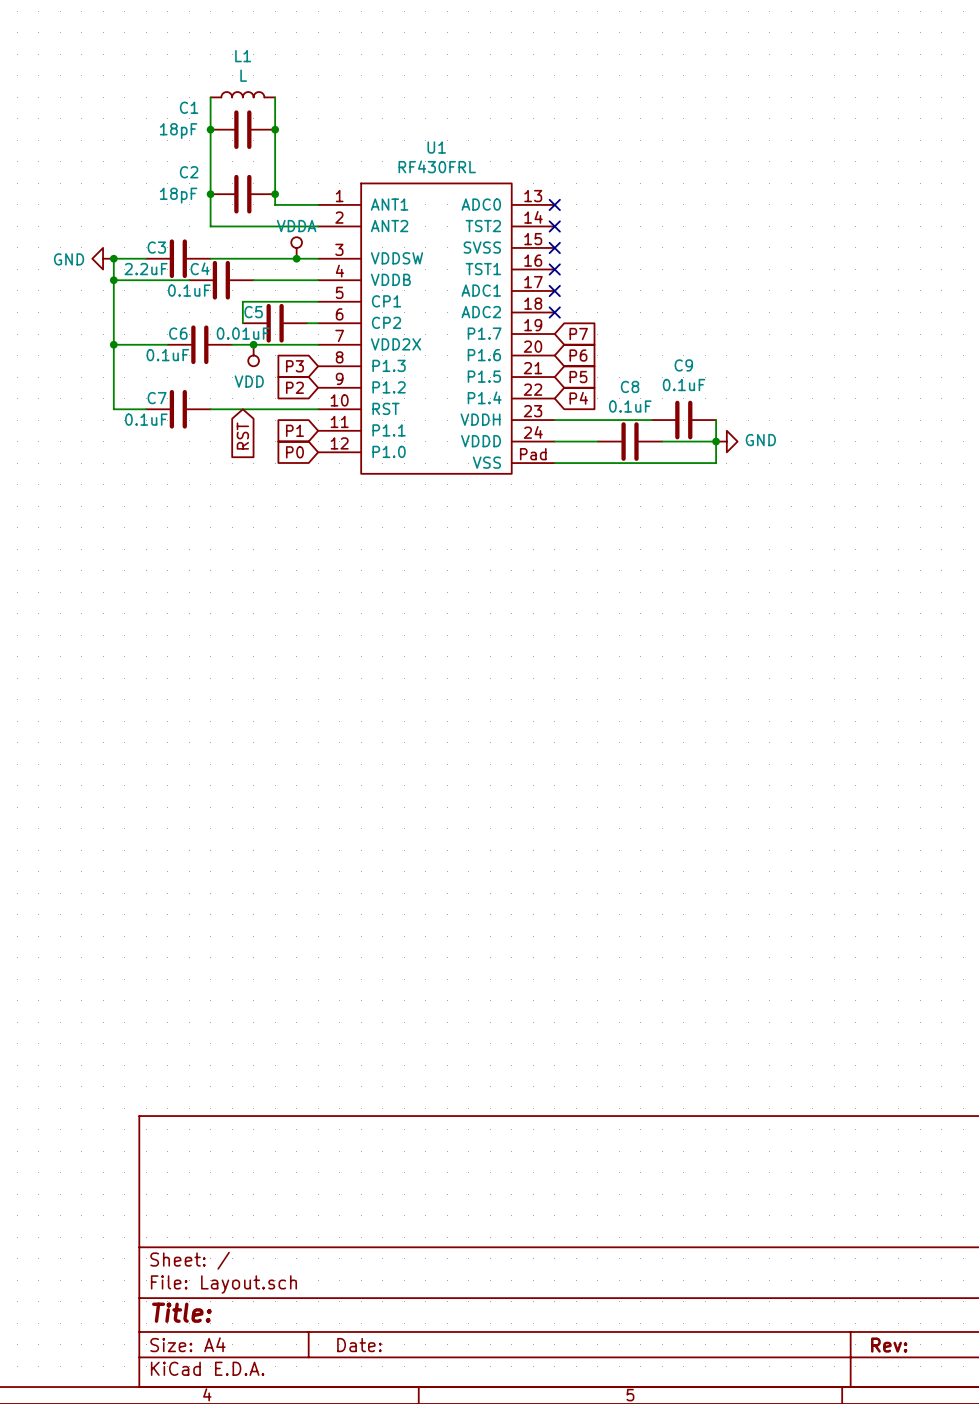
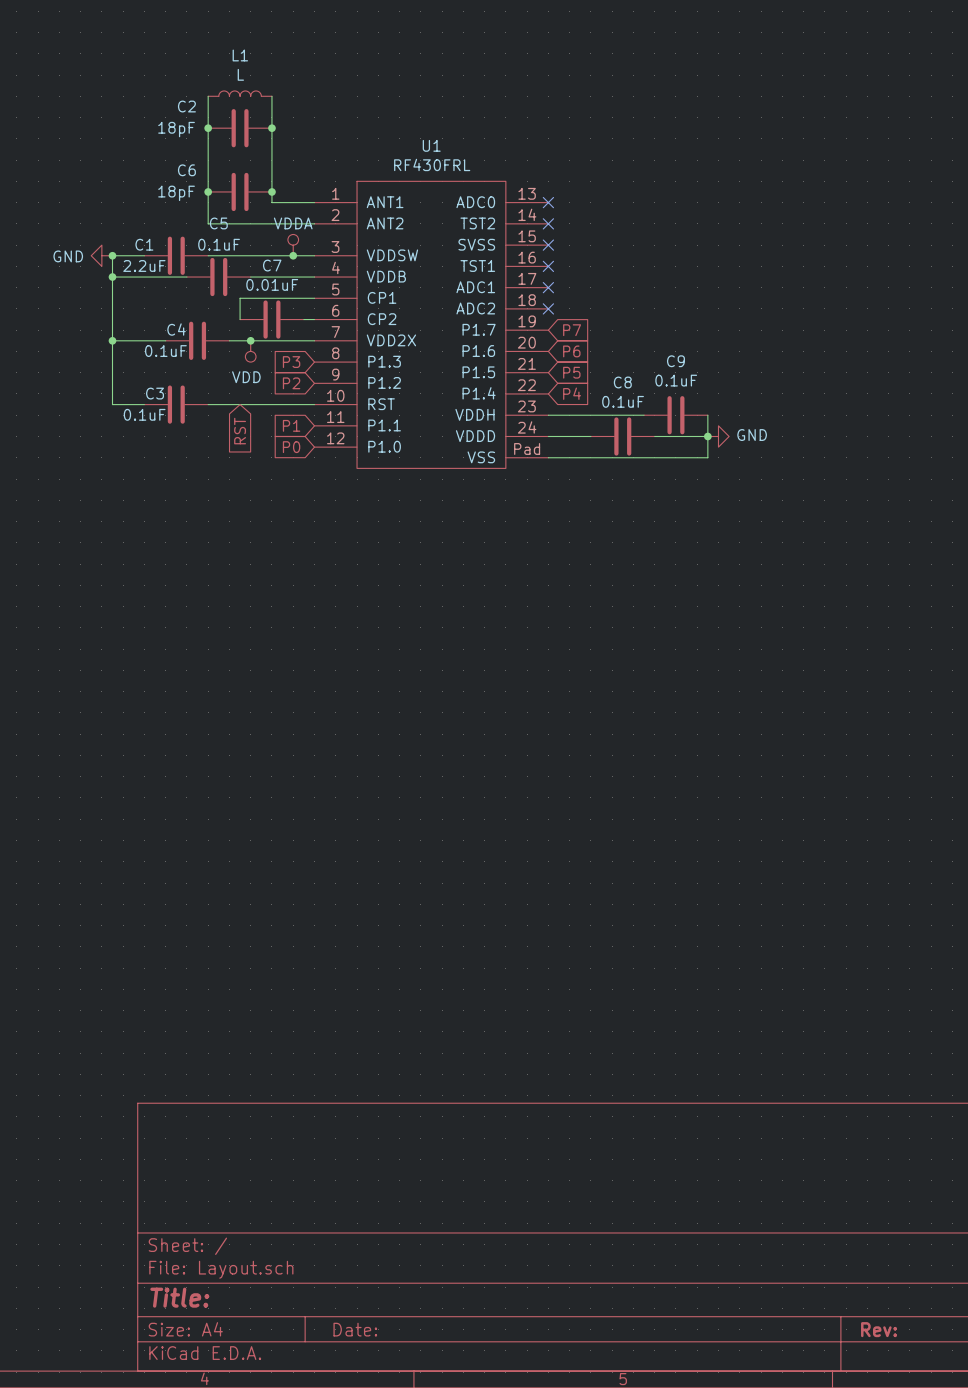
C1 name: C1 (189, 107) -> C2 (186, 106)
C2 name: C2 (189, 172) -> C6 (186, 170)
C3 name: C3 (156, 247) -> C1 (144, 244)
C4 name: C4 (200, 268) -> C5 (218, 223)
C4 value position: 0.1uF (189, 290) -> 0.1uF (219, 244)
C5 name: C5 (253, 312) -> C7 (272, 265)
C6 name: C6 (178, 333) -> C4 (176, 329)
C5 value position: 0.01uF (243, 333) -> 0.01uF (272, 284)
C7 name: C7 (157, 398) -> C3 (155, 393)

